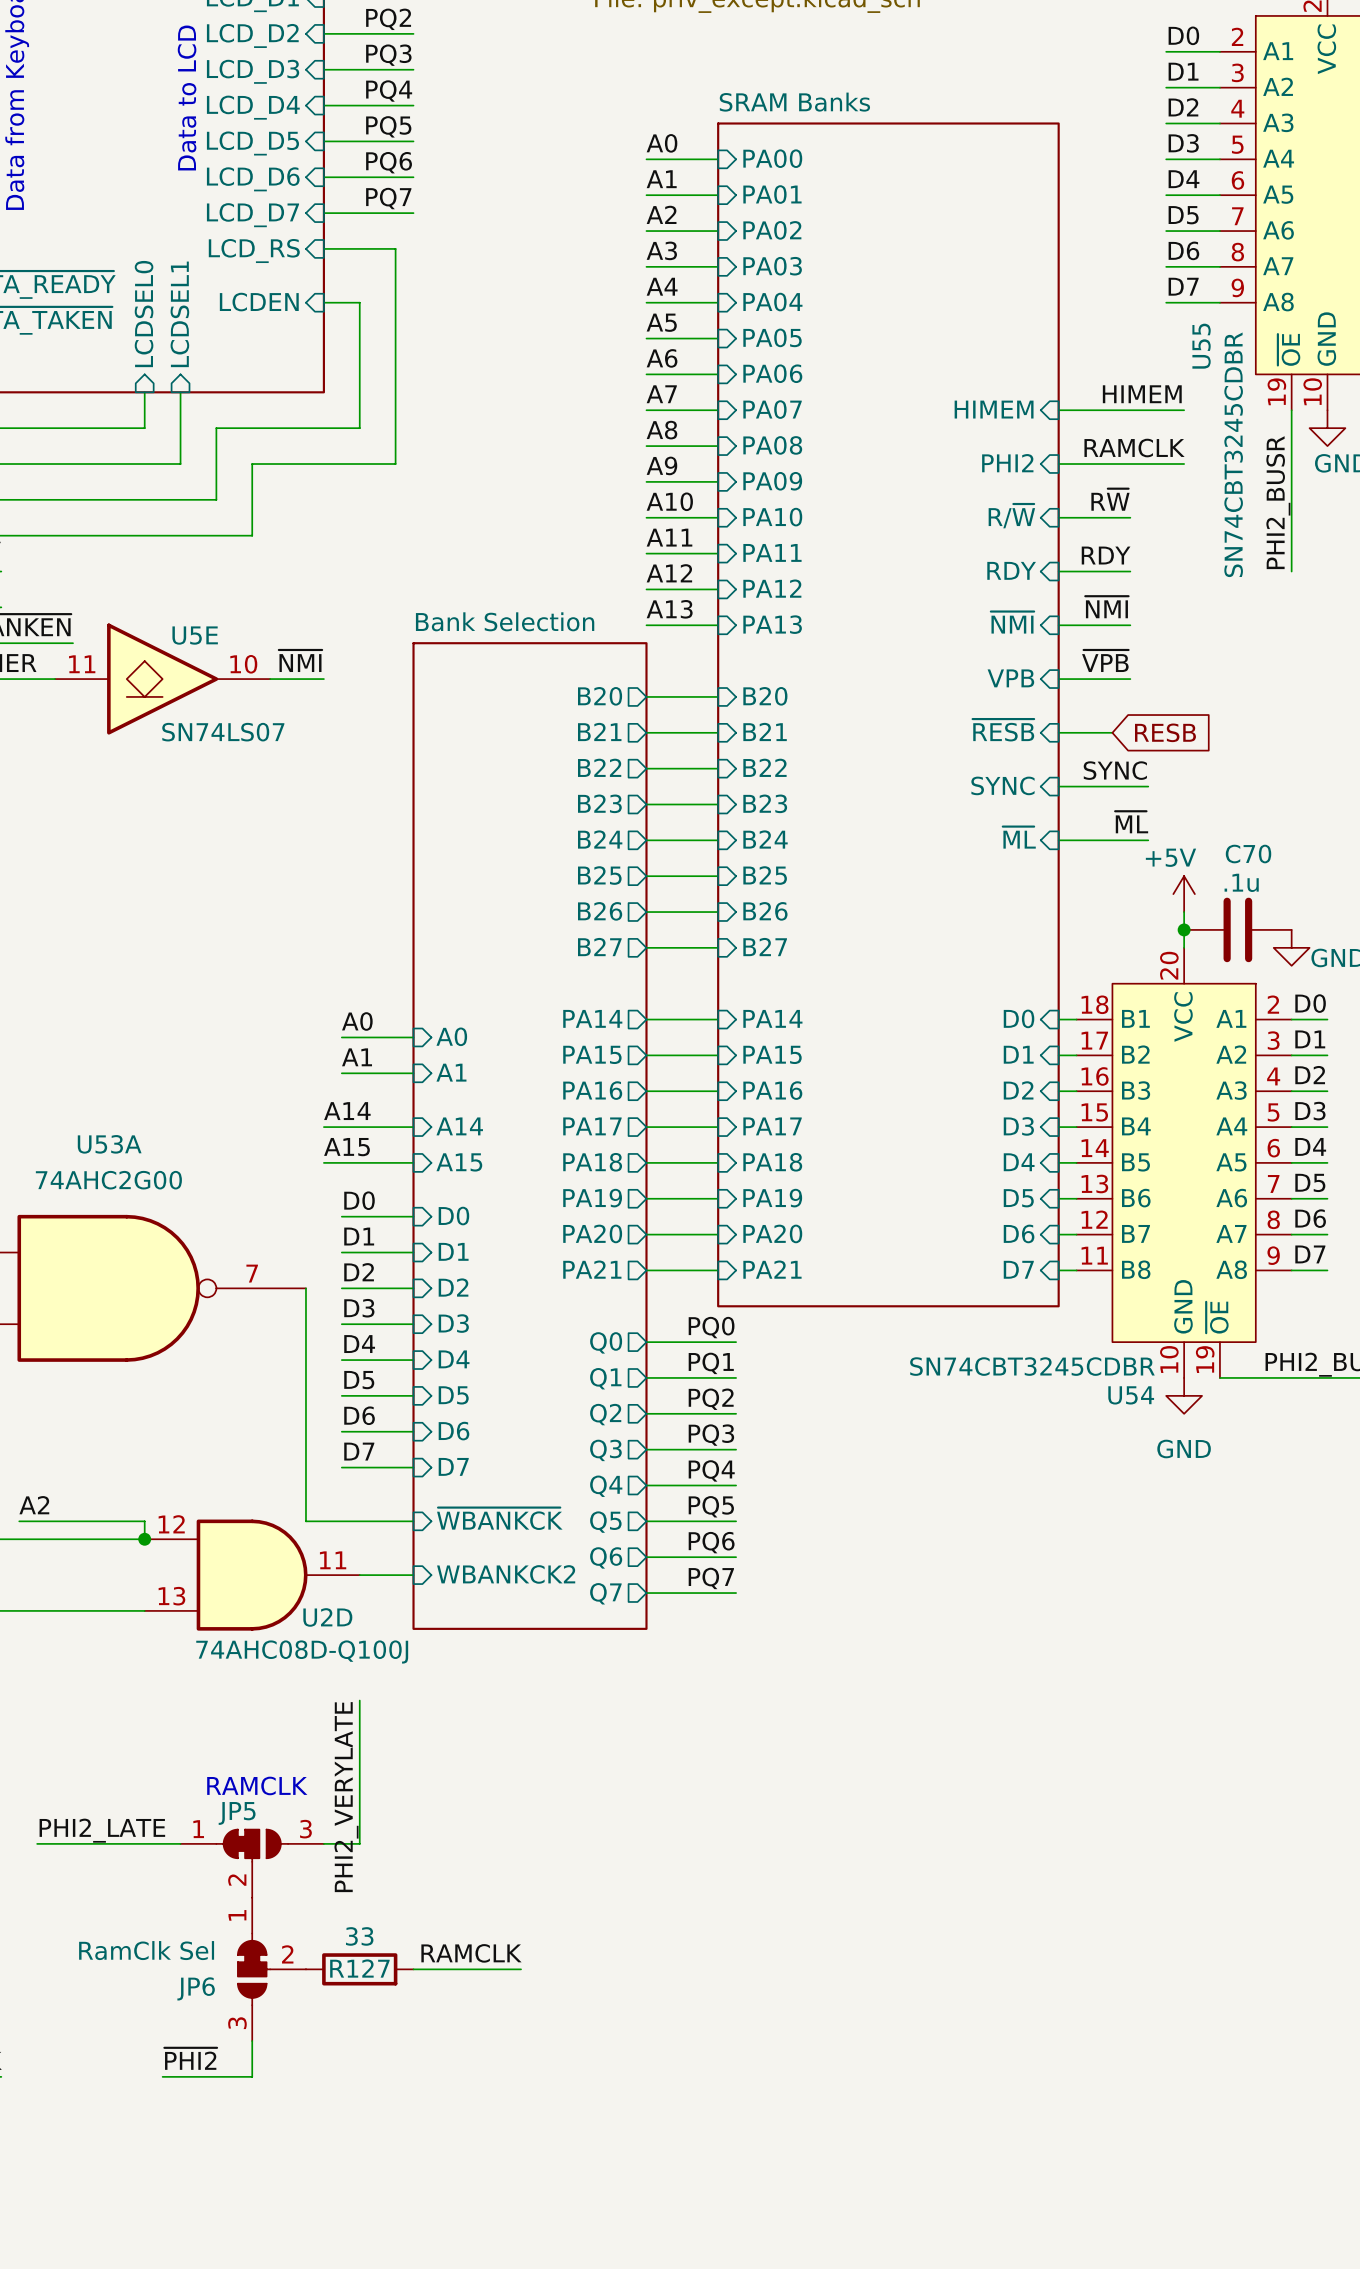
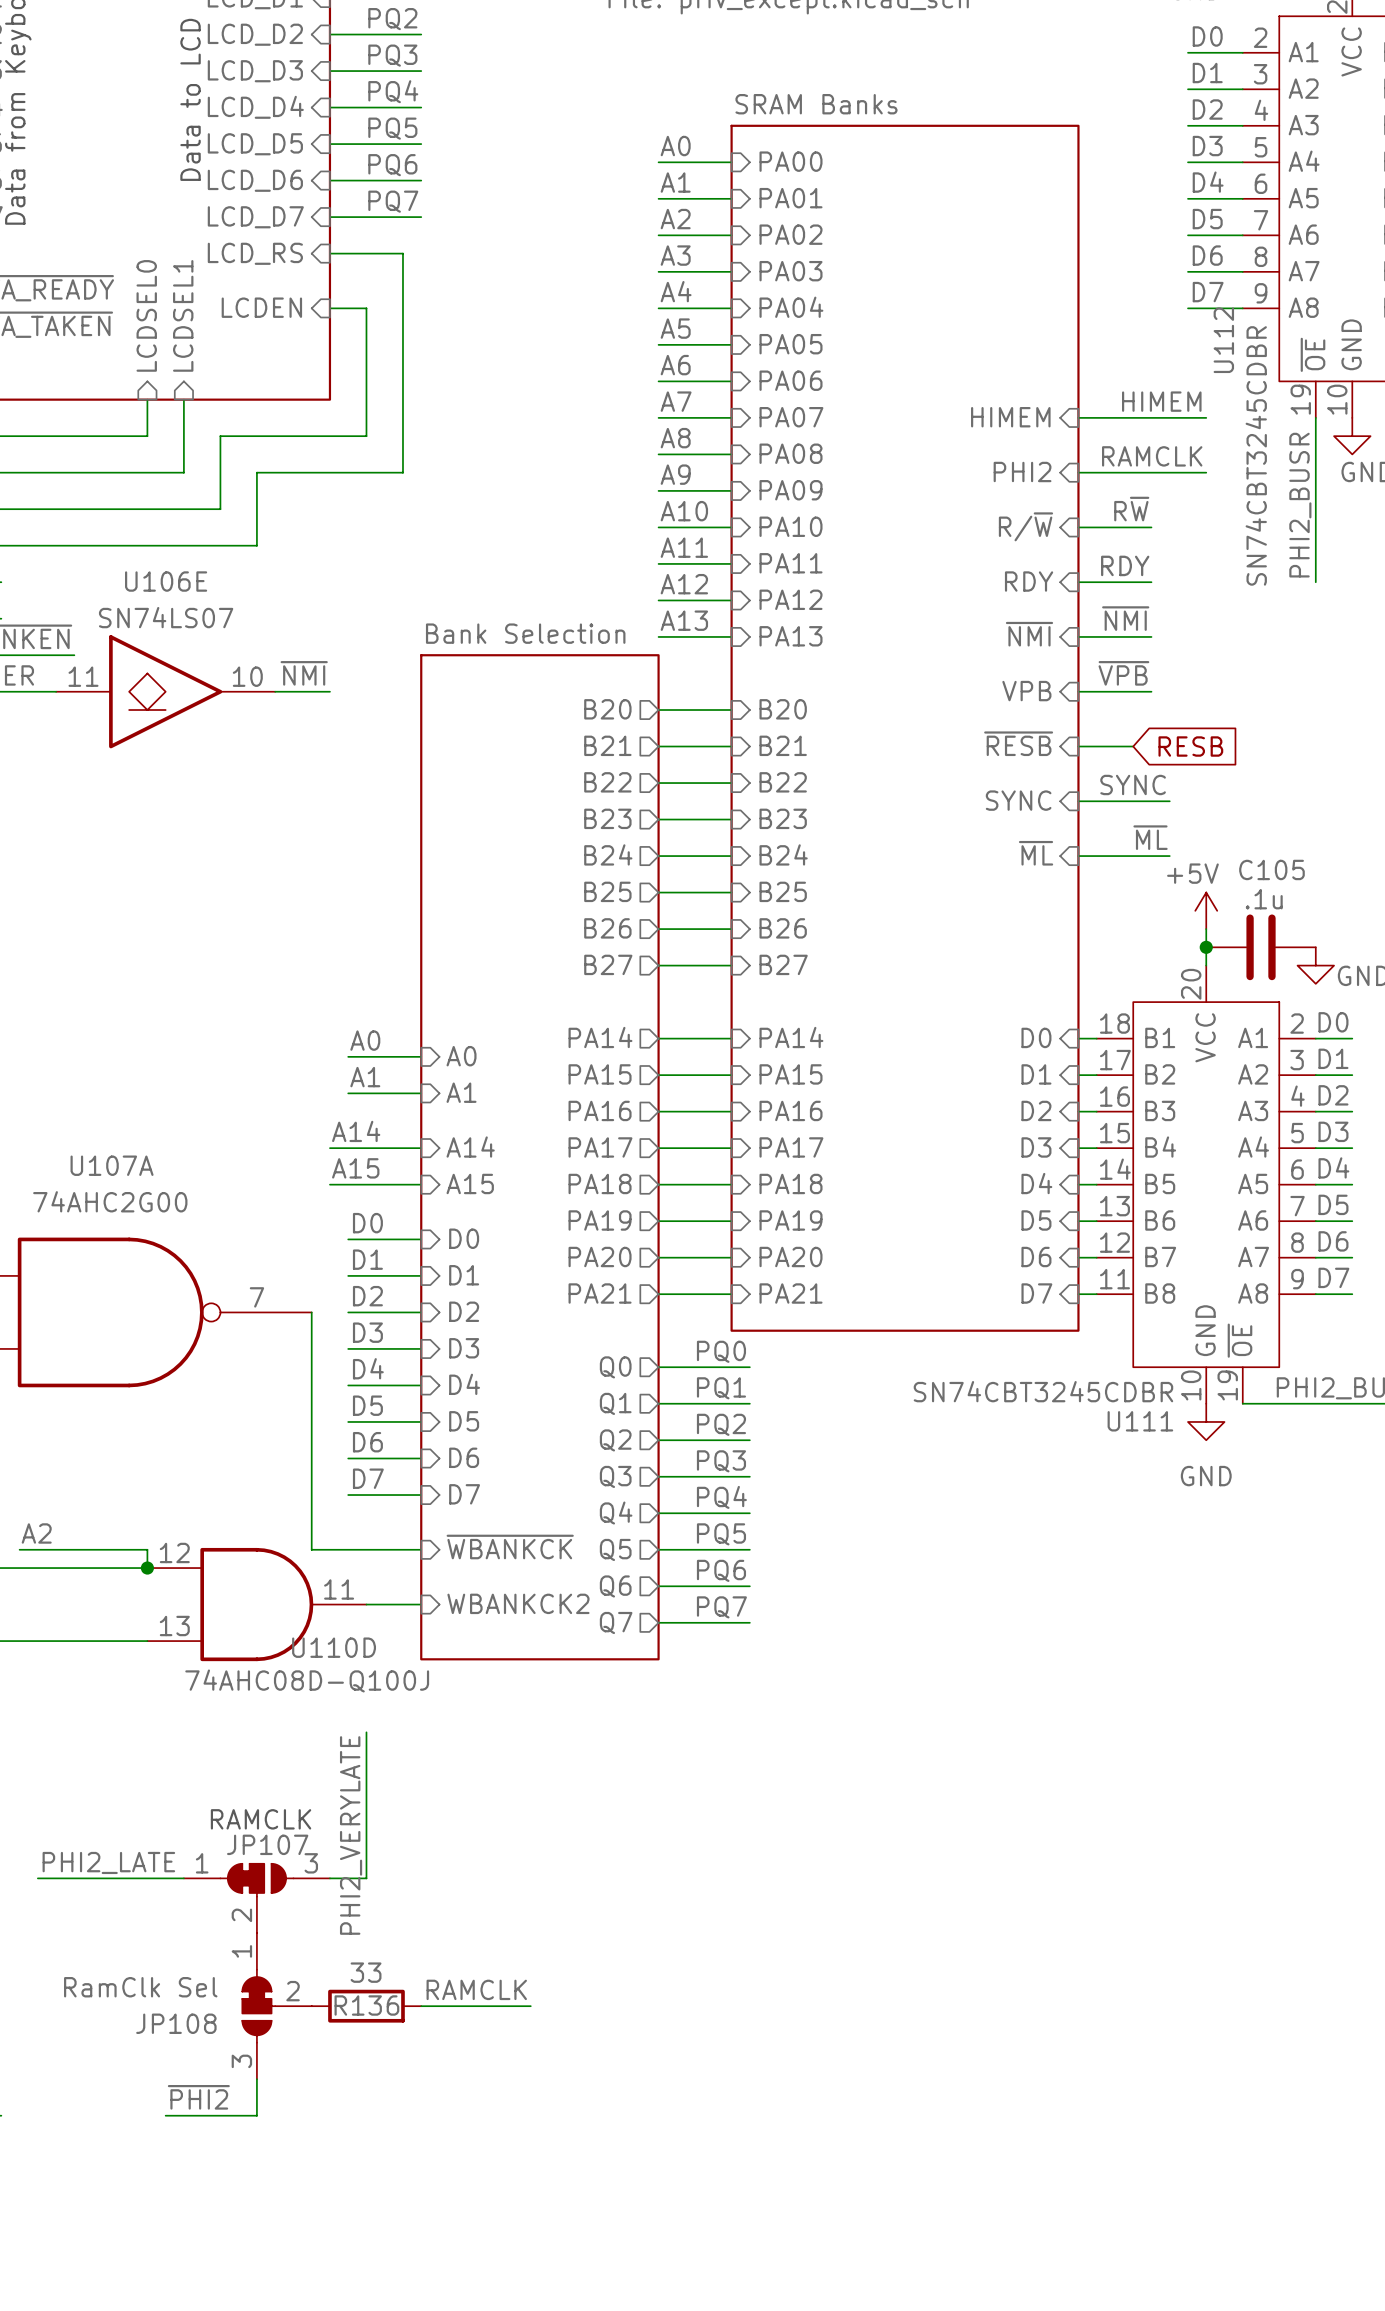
U55 name: U55 (1201, 346) -> U112 (1223, 340)
U5E name: U5E (195, 635) -> U106E (166, 581)
U5E value position: SN74LS07 (223, 732) -> SN74LS07 (166, 617)
C70 name: C70 (1248, 854) -> C105 (1271, 869)
U53A name: U53A (109, 1144) -> U107A (112, 1165)
U54 name: U54 (1131, 1395) -> U111 (1140, 1421)
U2D name: U2D (327, 1617) -> U110D (334, 1647)
JP5 name: JP5 (237, 1813) -> JP107 (267, 1844)
R127 name: R127 (359, 1968) -> R136 (366, 2005)
JP6 name: JP6 (196, 1988) -> JP108 (176, 2023)

